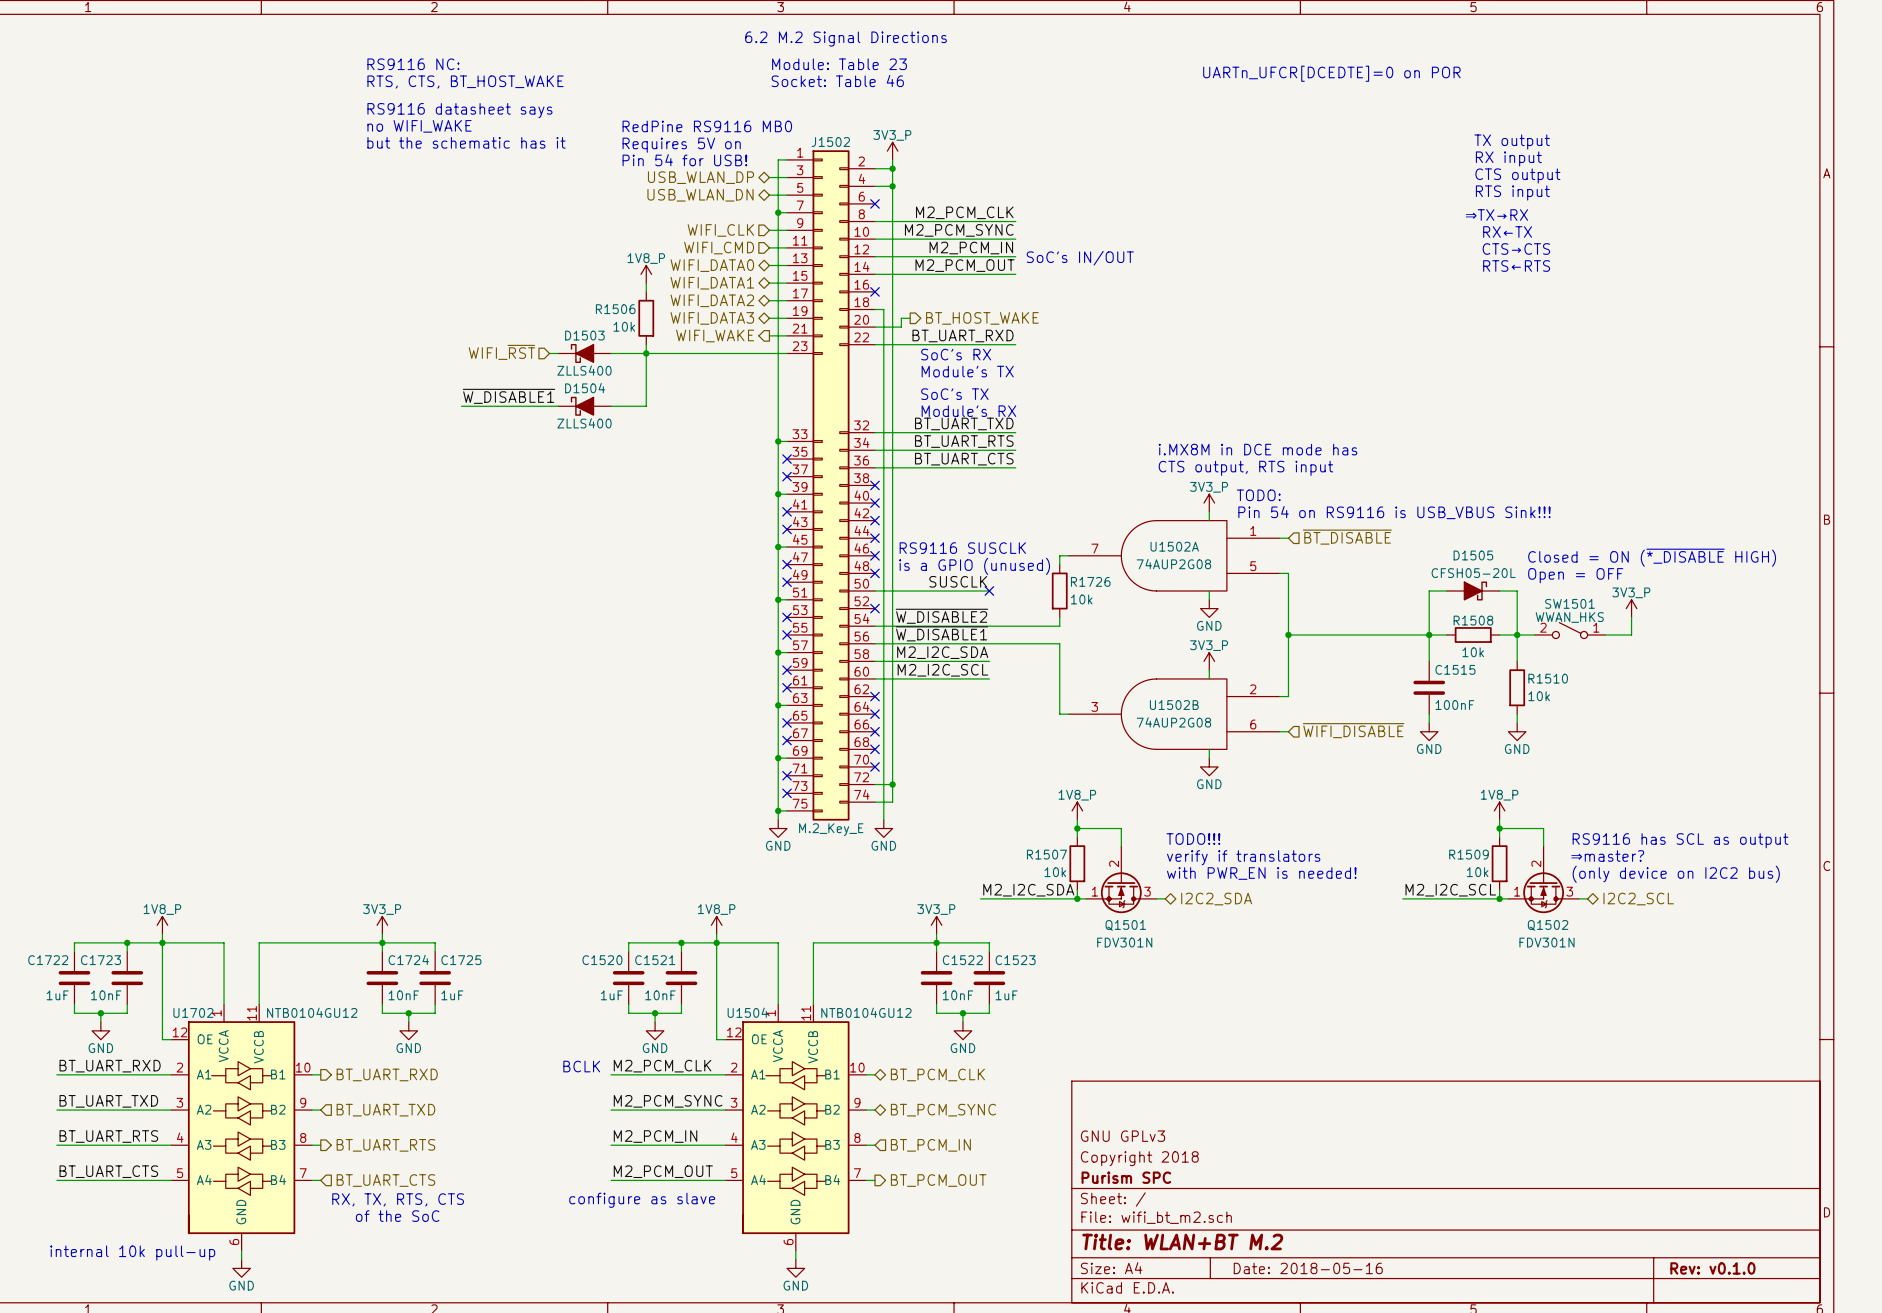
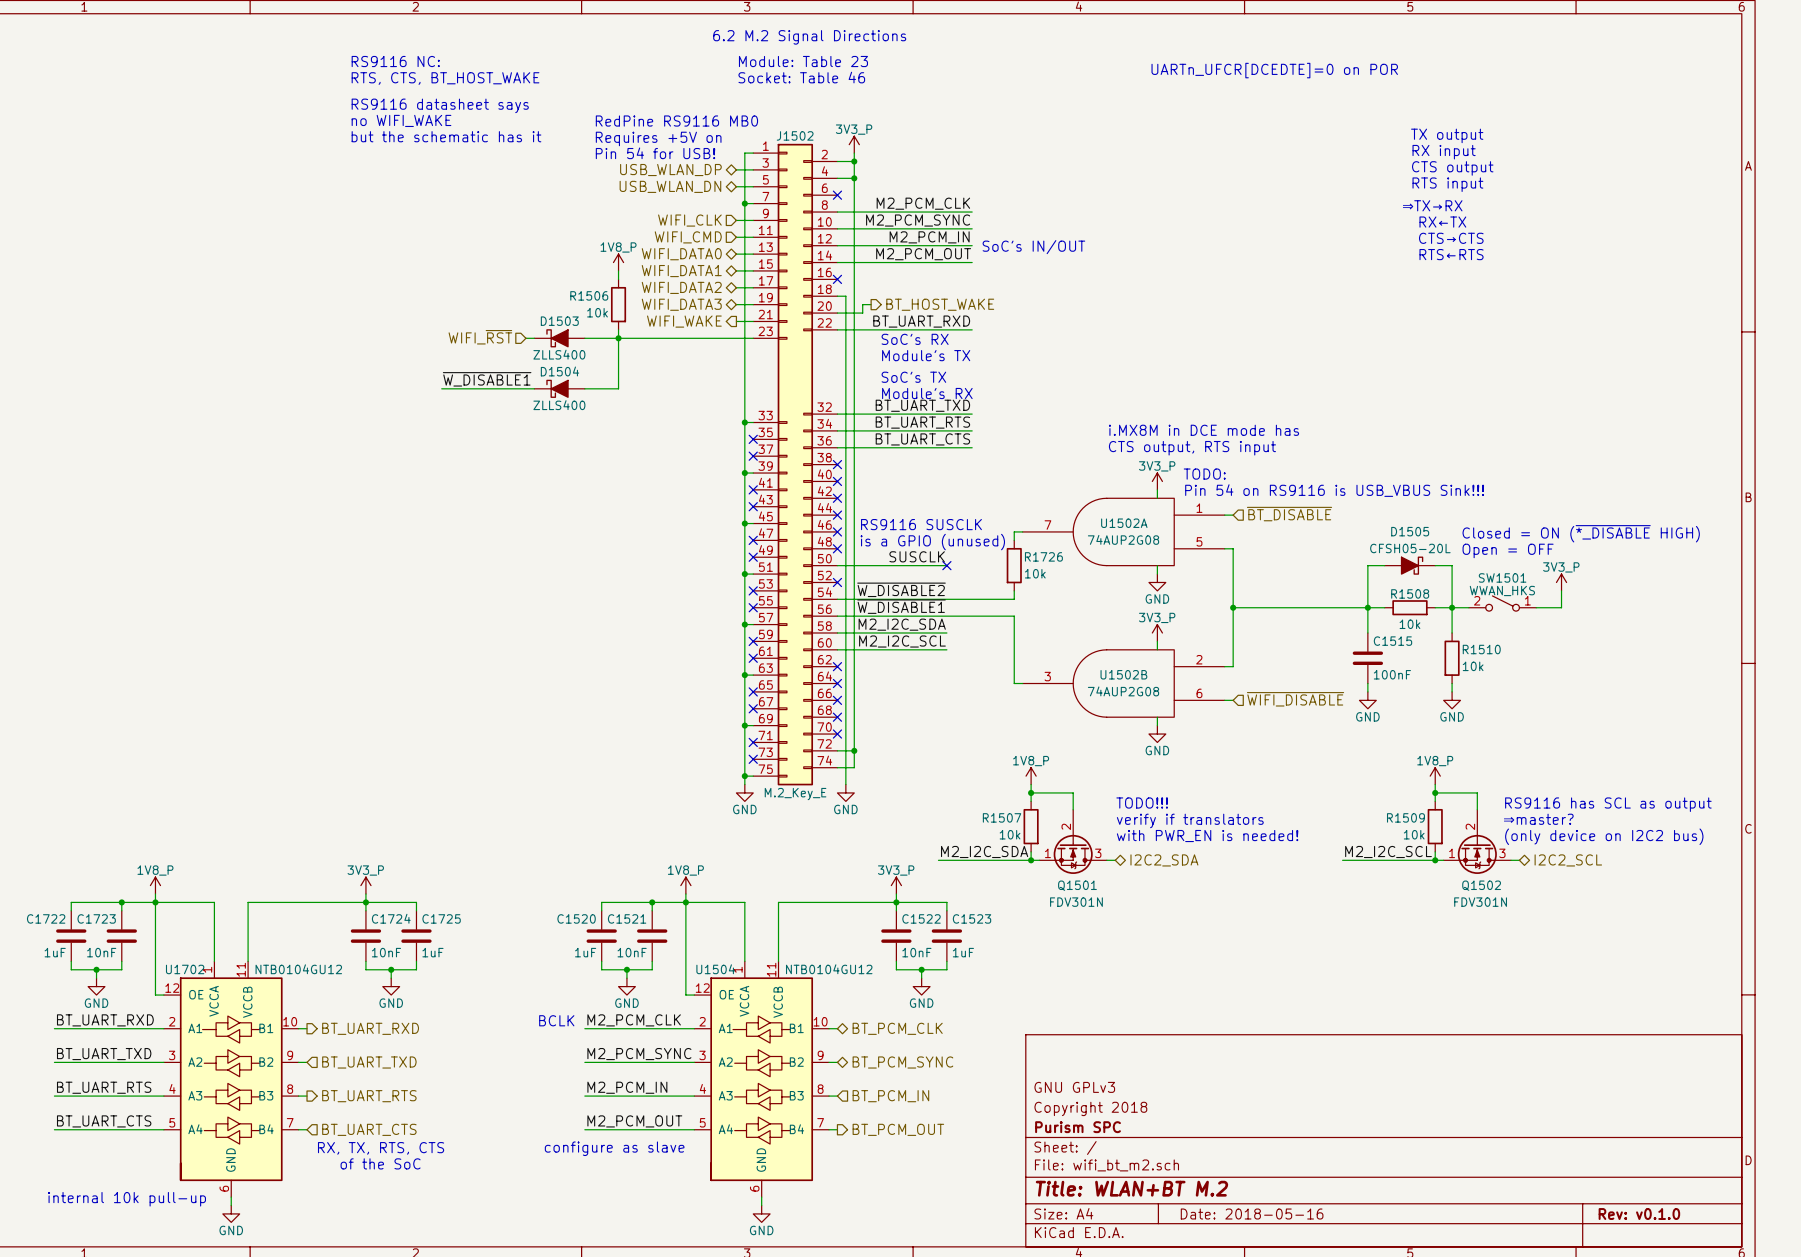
text: Requires 5V on (681, 145) -> Requires +5V on (658, 138)

